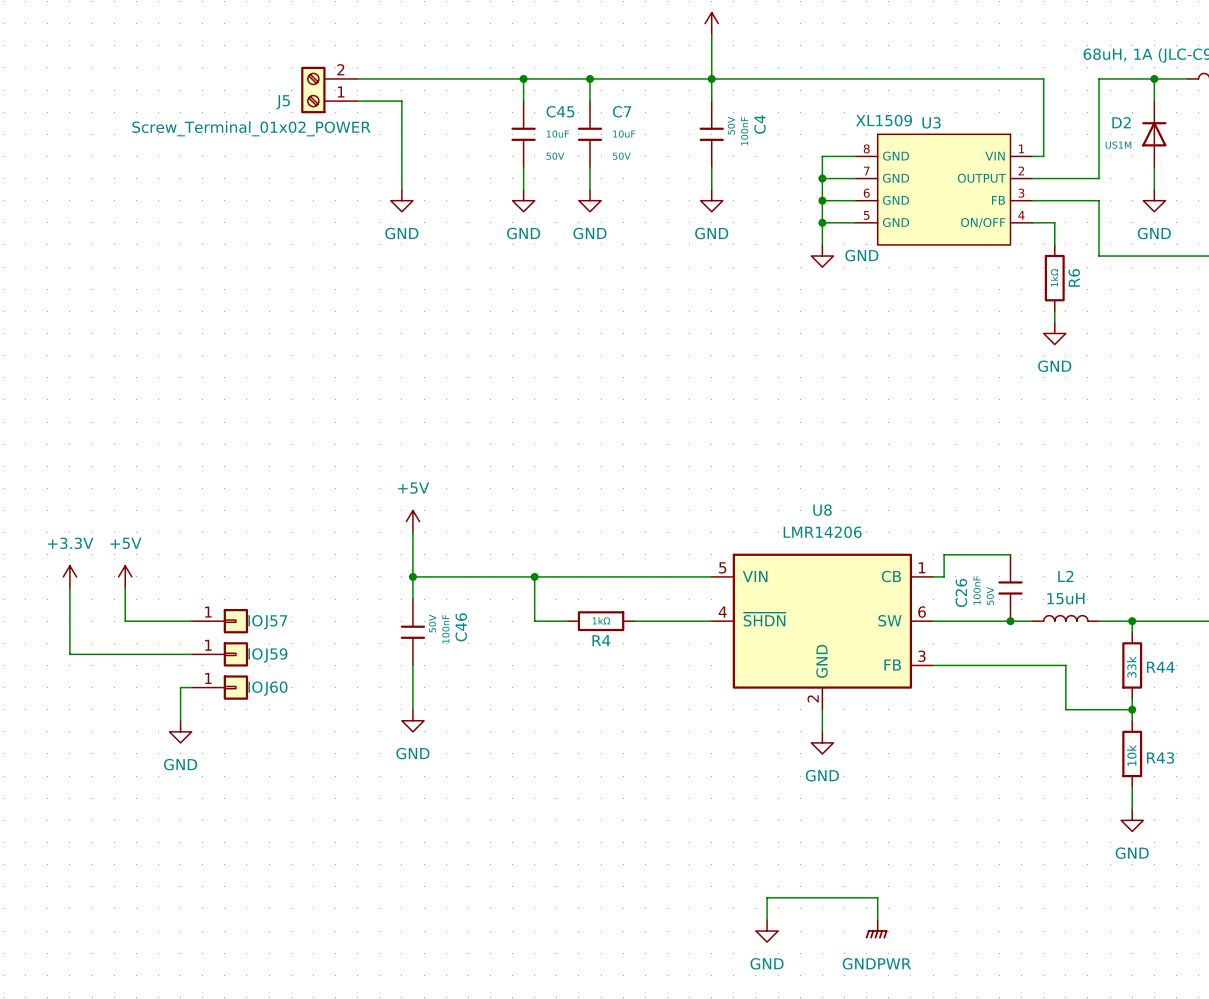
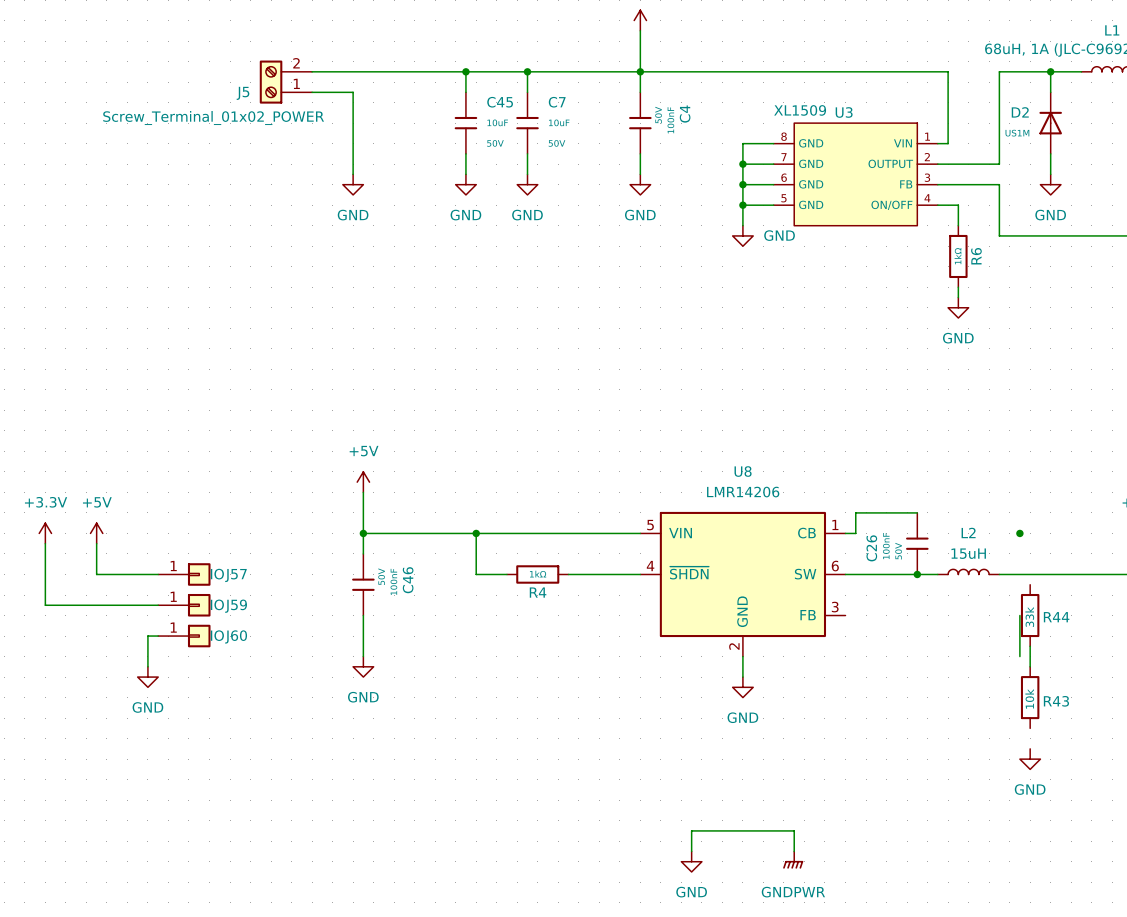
wire: (1132, 621) (1132, 632) -> none
junction position: (1132, 621) -> (1019, 533)
wire: (933, 665) (1065, 665) (1065, 709) (1132, 709) -> none
wire: none -> (1019, 615) (1019, 656)
junction: (1132, 709) -> none
wire: (1132, 787) (1132, 809) -> none

